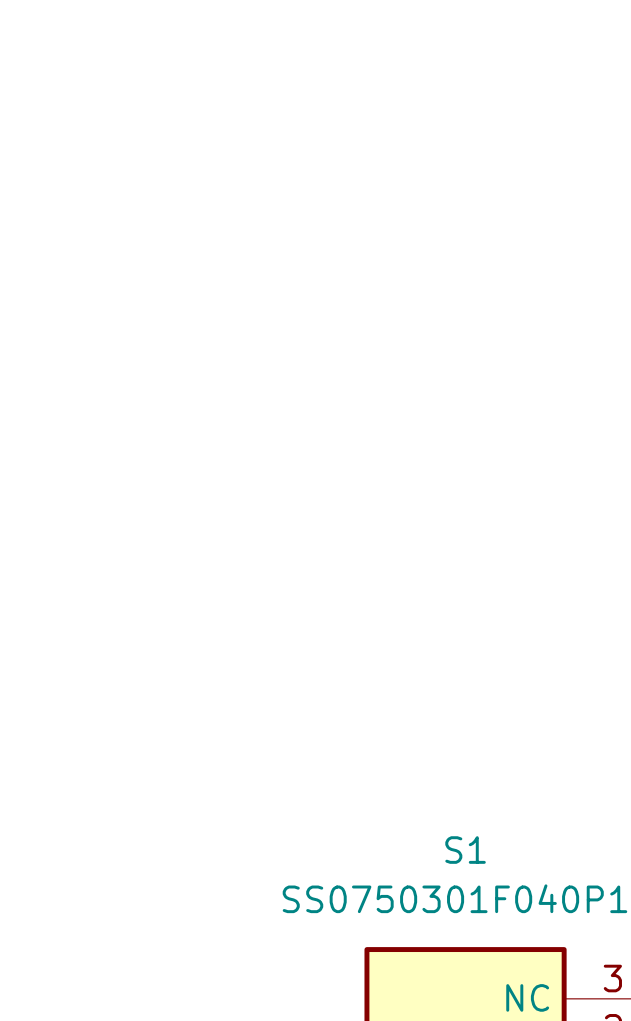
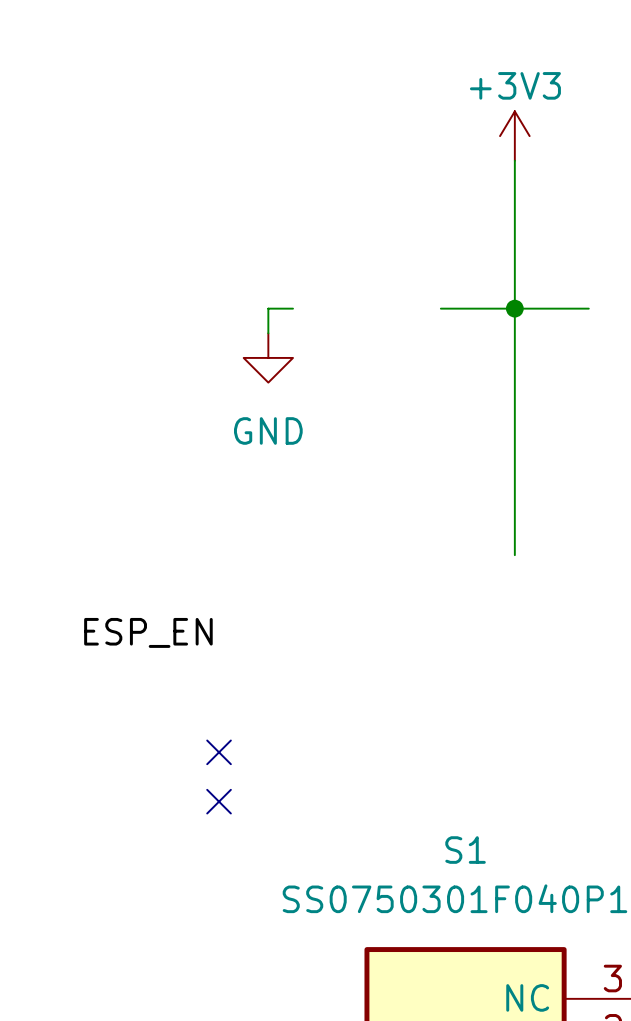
power symbol: none -> +3V3 (514, 136)
wire: none -> (514, 160) (514, 555)
wire: none -> (292, 308) (268, 308) (268, 333)
wire: none -> (440, 308) (588, 308)
junction: none -> (514, 308)
power symbol: none -> GND (268, 357)
label: none -> ESP_EN (148, 632)
no-connect mark: none -> (219, 752)
no-connect mark: none -> (219, 801)

